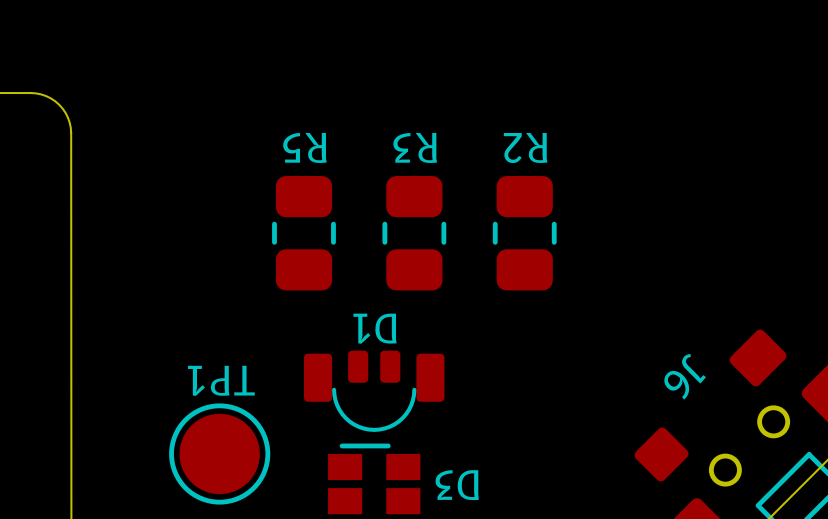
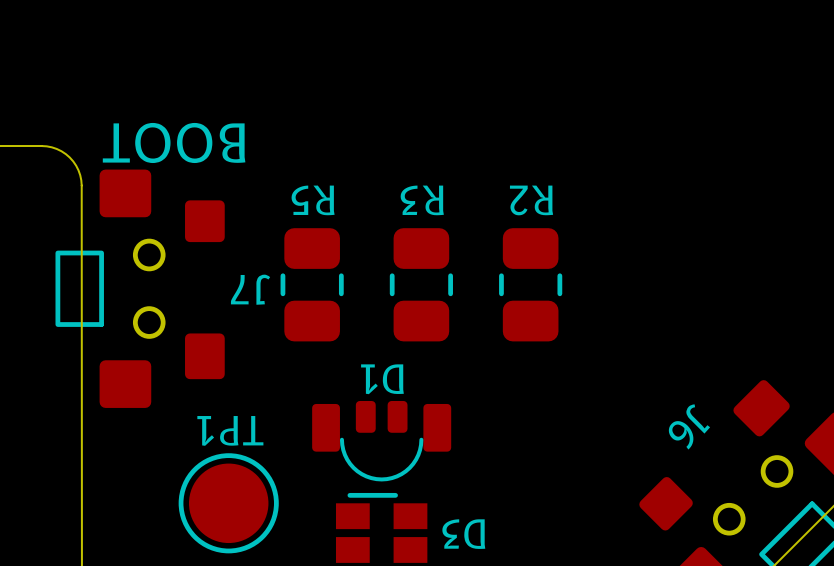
text: none -> BOOT (174, 142)
J7: none -> (140, 288)

